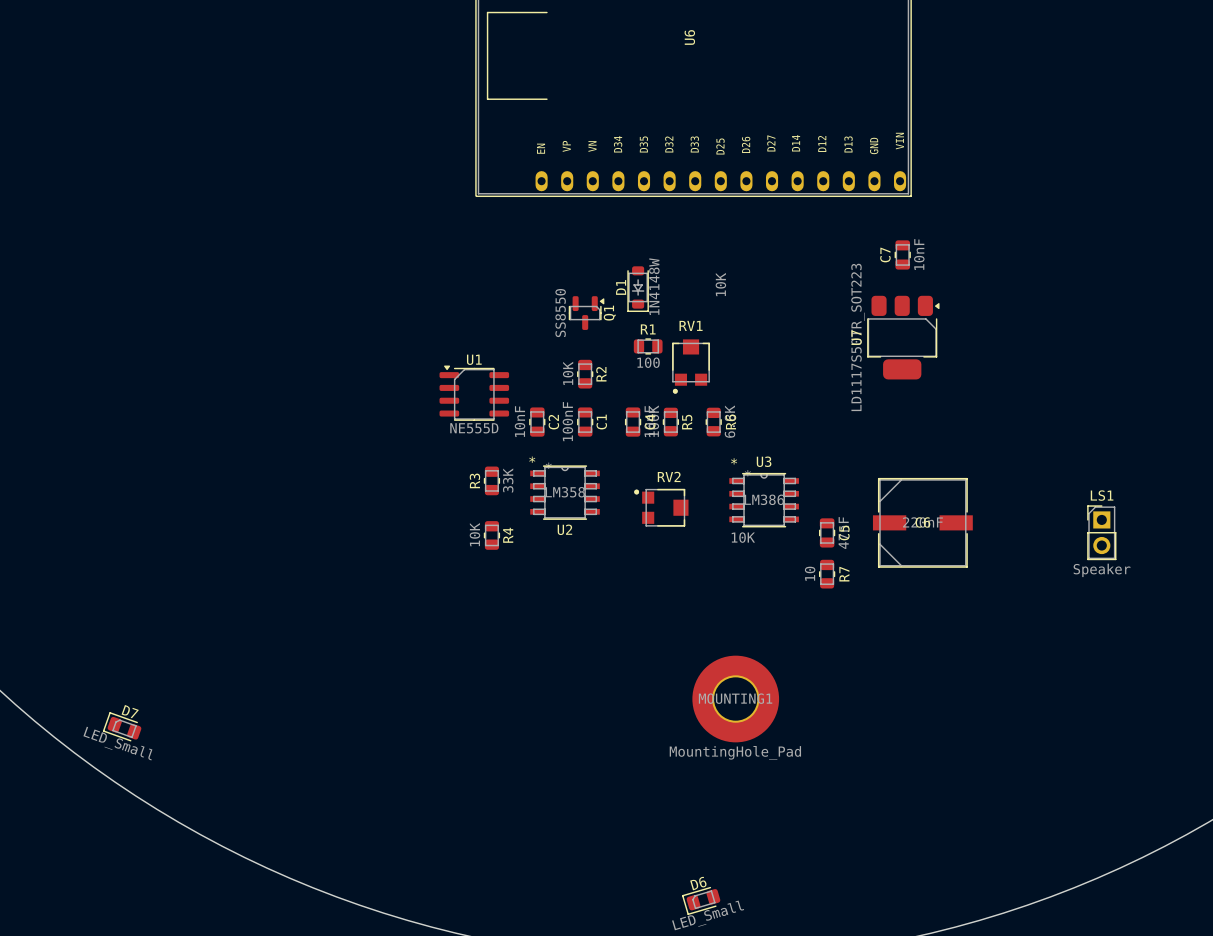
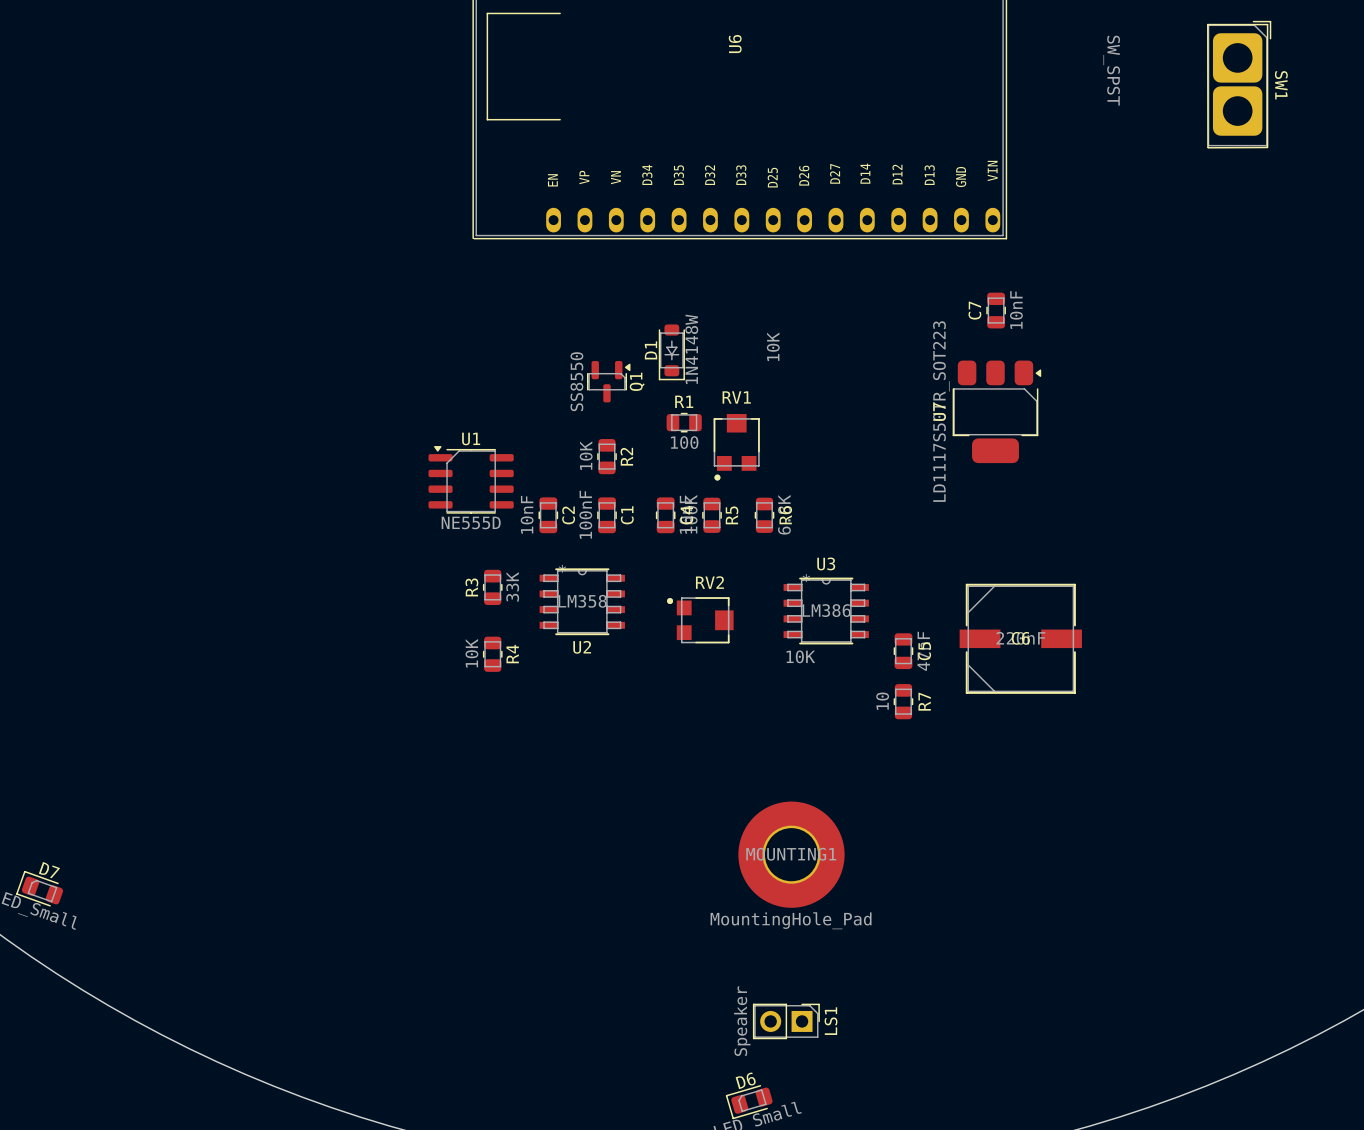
SW1: none -> SW_SPST (1239, 84)
U2 text: * (532, 459) -> none
U3 text: * (734, 461) -> none
LS1 rotation: 0° (1101, 532) -> 90° clockwise (786, 1021)
LS1 position: (1101, 532) -> (786, 1021)

